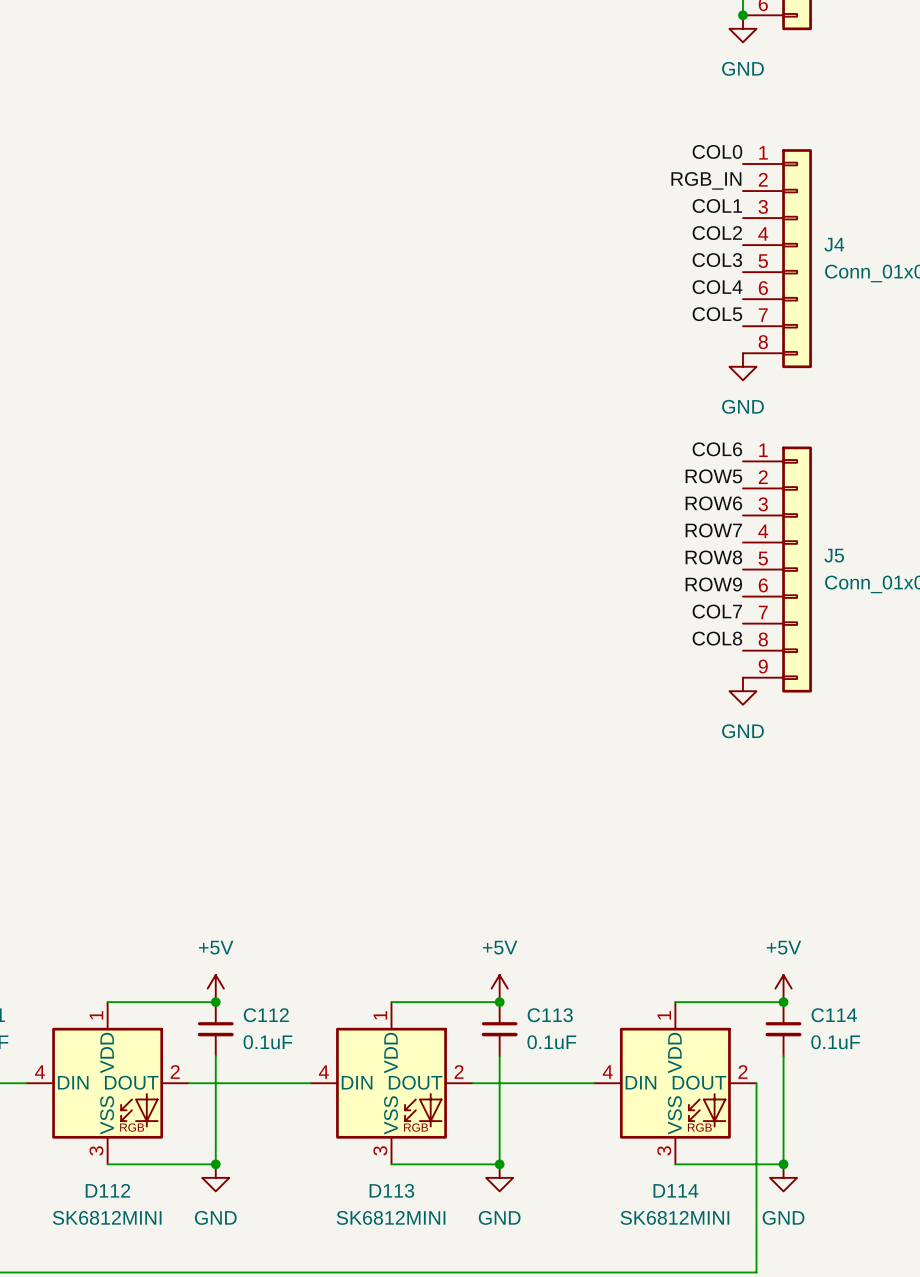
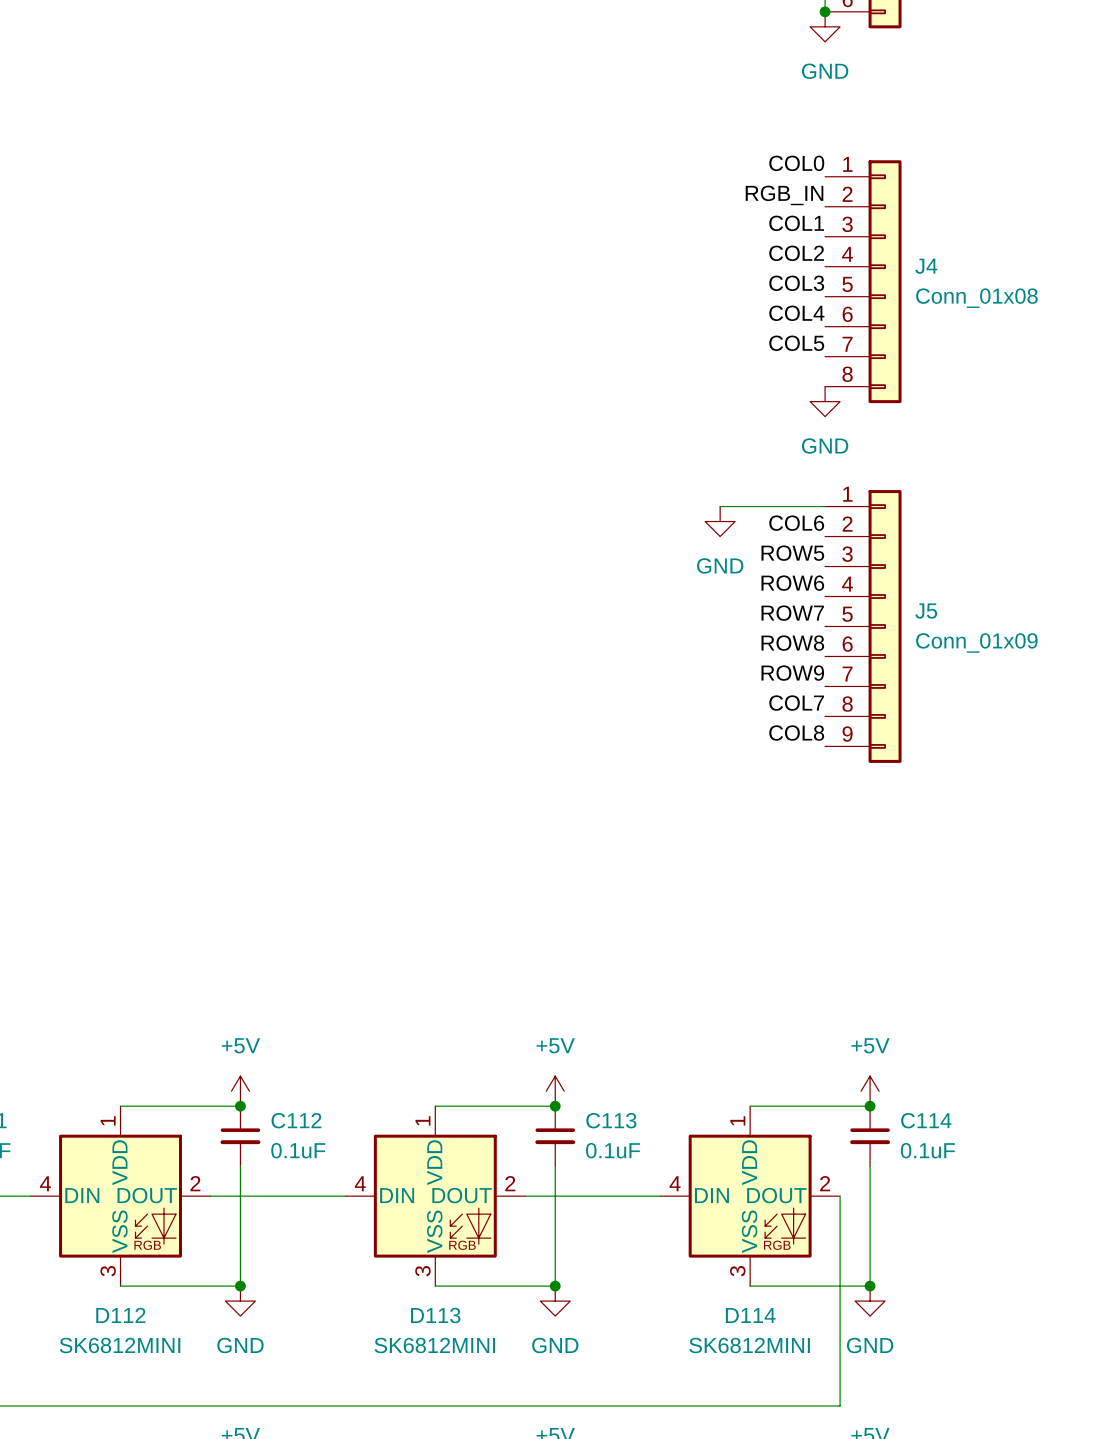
label: COL6 (717, 449) -> none
wire: none -> (720, 506) (825, 506)
label: ROW5 (713, 476) -> COL6 (796, 523)
label: ROW6 (713, 503) -> ROW5 (792, 553)
label: ROW7 (713, 530) -> ROW6 (792, 583)
label: ROW8 (713, 557) -> ROW7 (792, 613)
label: ROW9 (713, 584) -> ROW8 (792, 643)
label: COL7 (717, 611) -> ROW9 (792, 673)
label: COL8 (717, 638) -> COL7 (796, 703)
label: none -> COL8 (796, 733)
power symbol position: GND (742, 691) -> GND (720, 521)

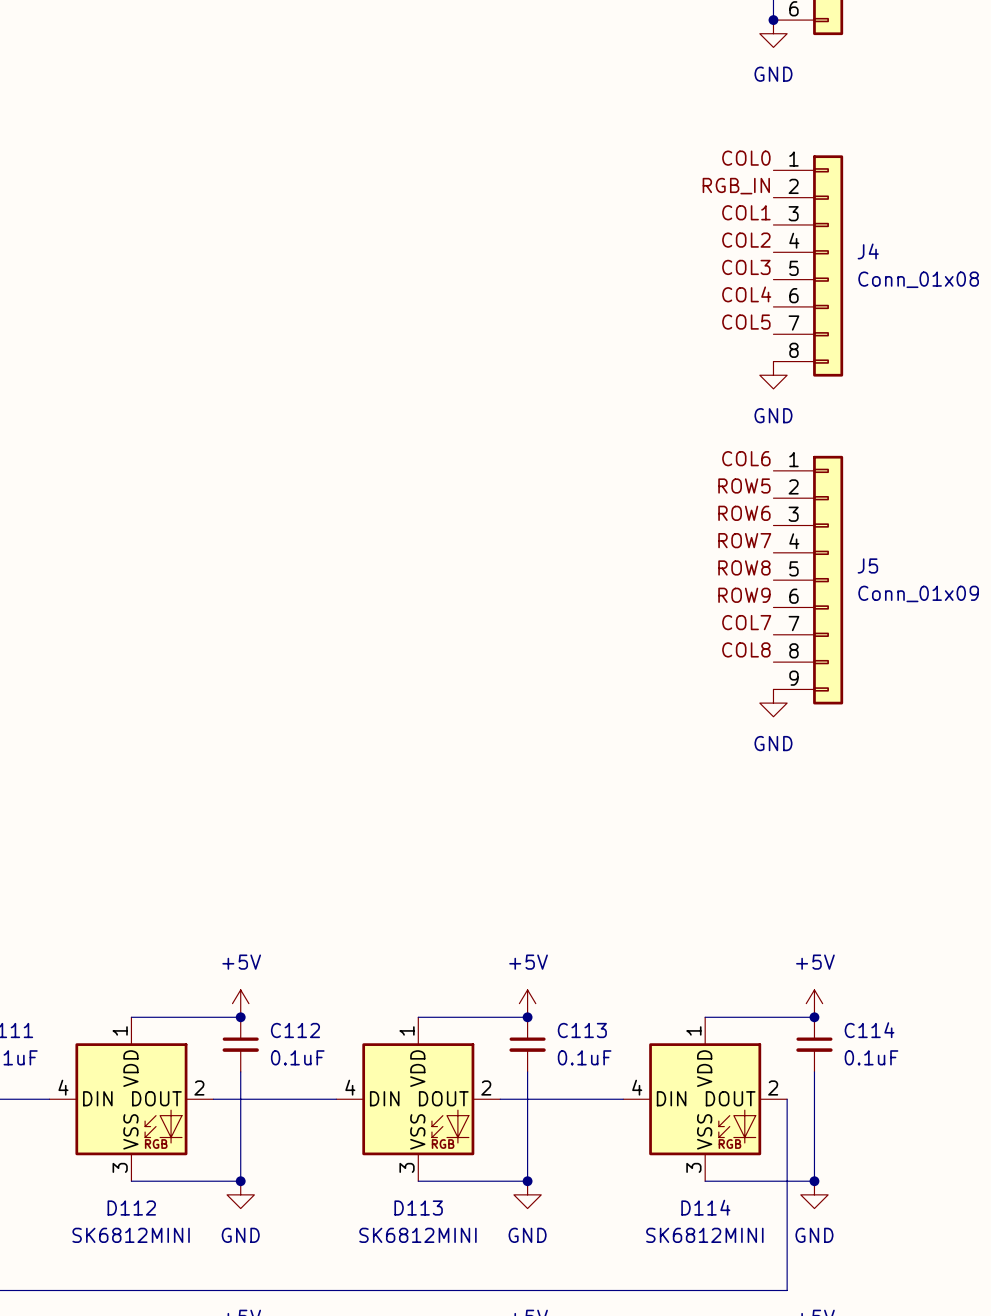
label: none -> COL6 (746, 458)
wire: (720, 506) (825, 506) -> none
power symbol position: GND (720, 521) -> GND (773, 703)
label: COL6 (796, 523) -> ROW5 (744, 486)
label: ROW5 (792, 553) -> ROW6 (744, 513)
label: ROW6 (792, 583) -> ROW7 (744, 540)
label: ROW7 (792, 613) -> ROW8 (744, 567)
label: ROW8 (792, 643) -> ROW9 (744, 595)
label: ROW9 (792, 673) -> COL7 (746, 622)
label: COL7 (796, 703) -> COL8 (746, 649)
label: COL8 (796, 733) -> none

